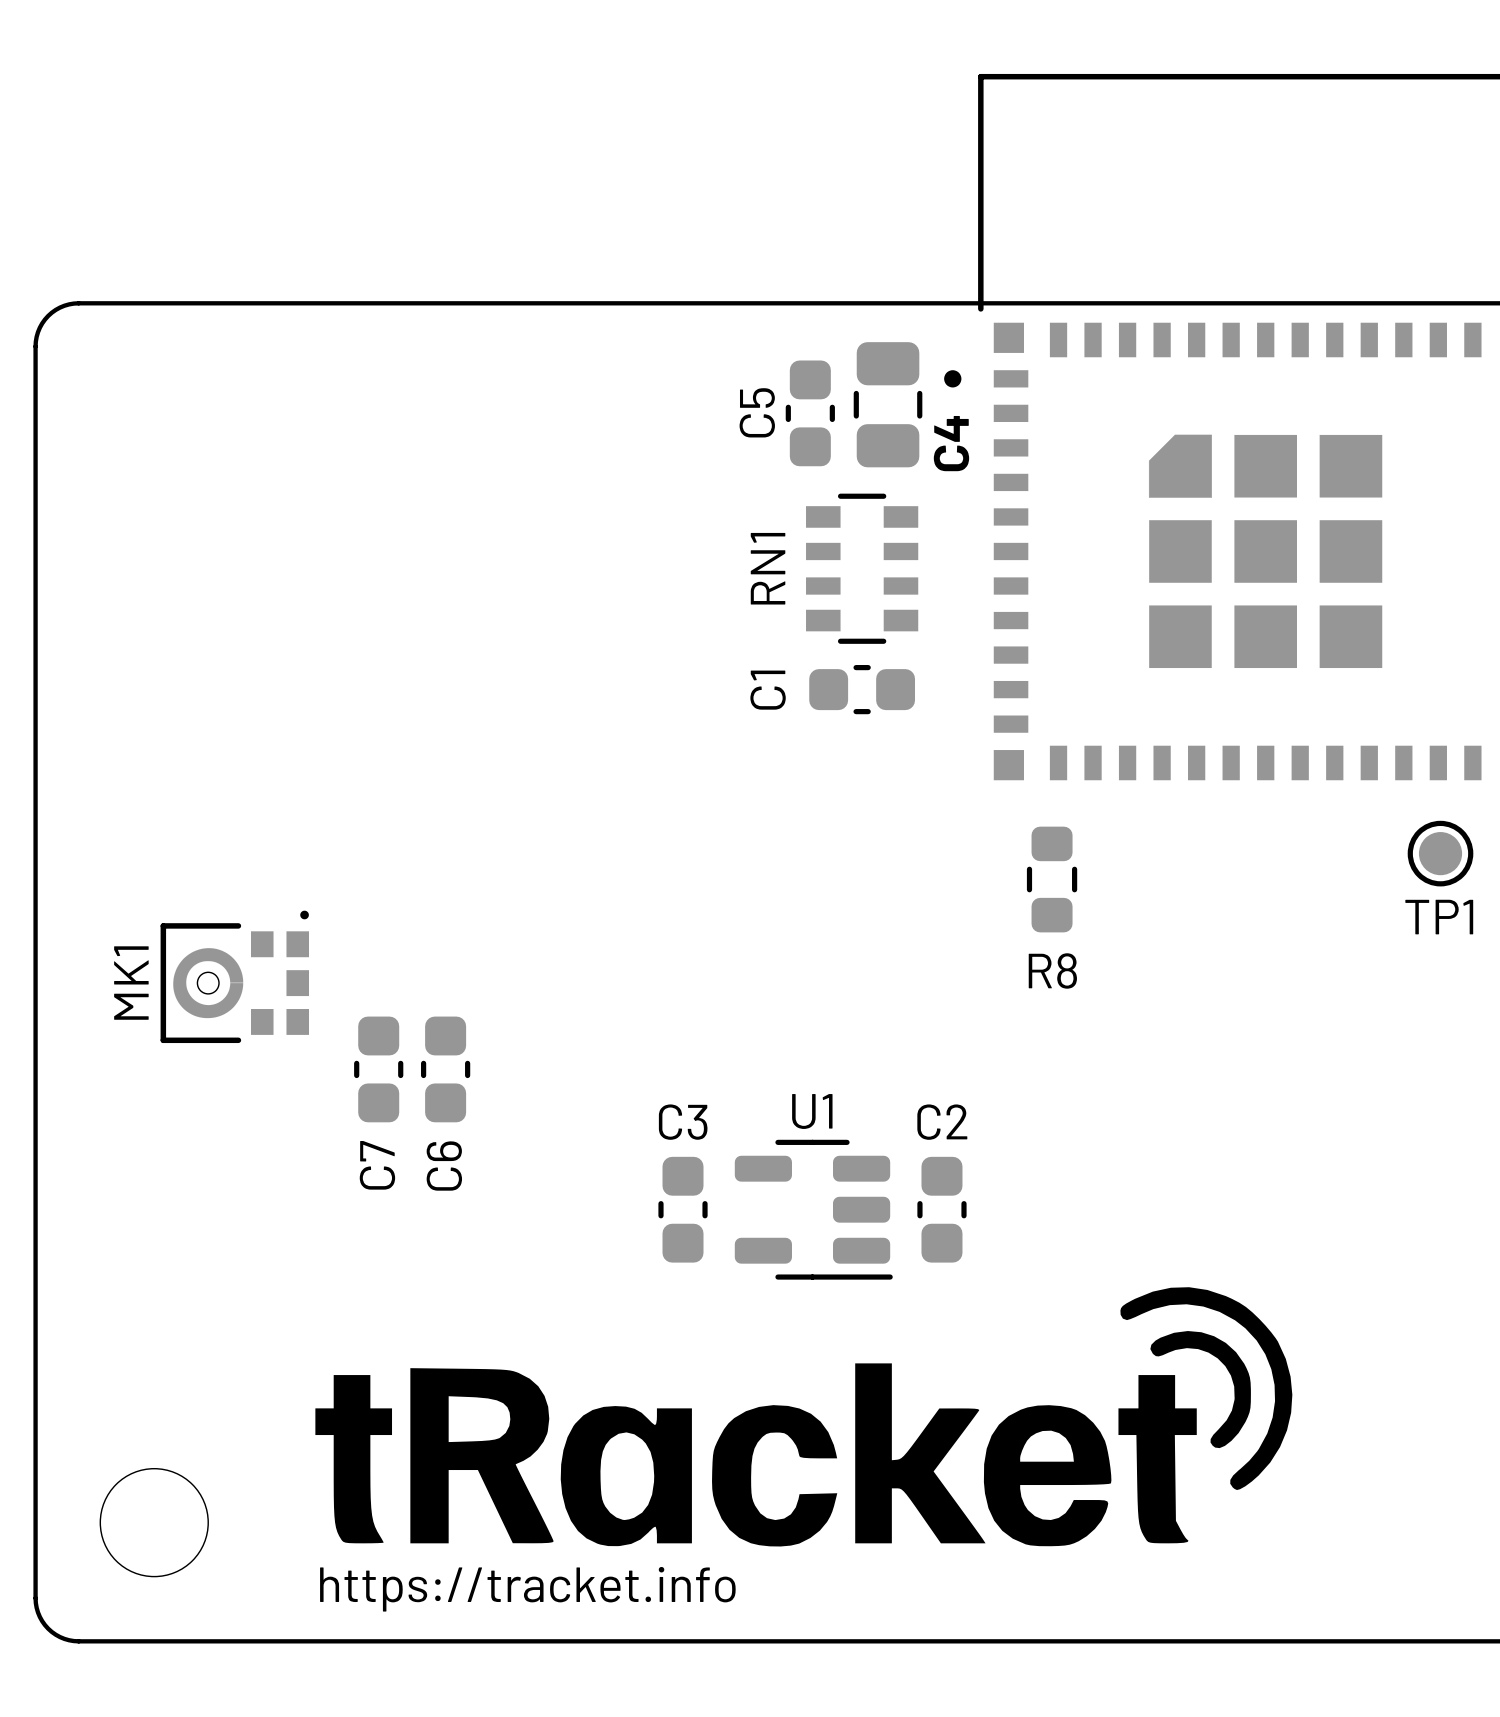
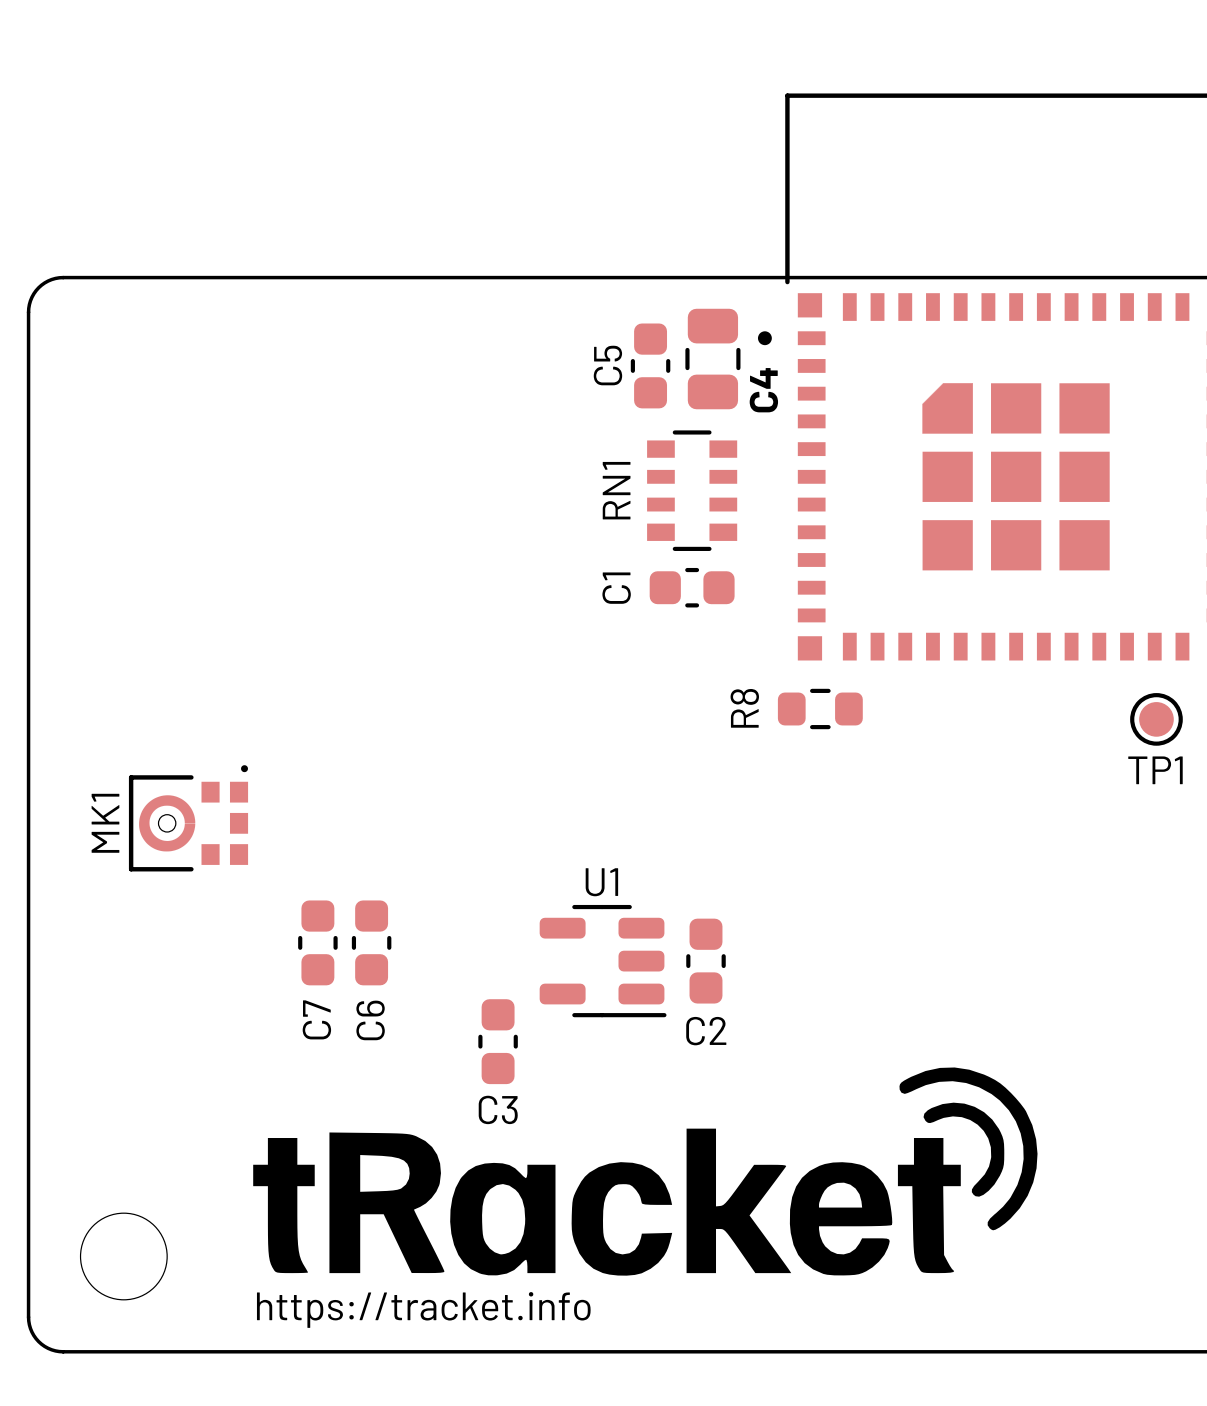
R8 rotation: 0° (1052, 879) -> 90° clockwise (820, 709)
C7 position: (378, 1069) -> (317, 942)
C6 position: (445, 1069) -> (371, 942)
C3 name position: C3 (683, 1122) -> C3 (498, 1109)
C2 name position: C2 (942, 1122) -> C2 (706, 1031)
C3 position: (683, 1209) -> (498, 1041)
U1 position: (813, 1209) -> (603, 961)
C2 position: (941, 1209) -> (706, 961)

